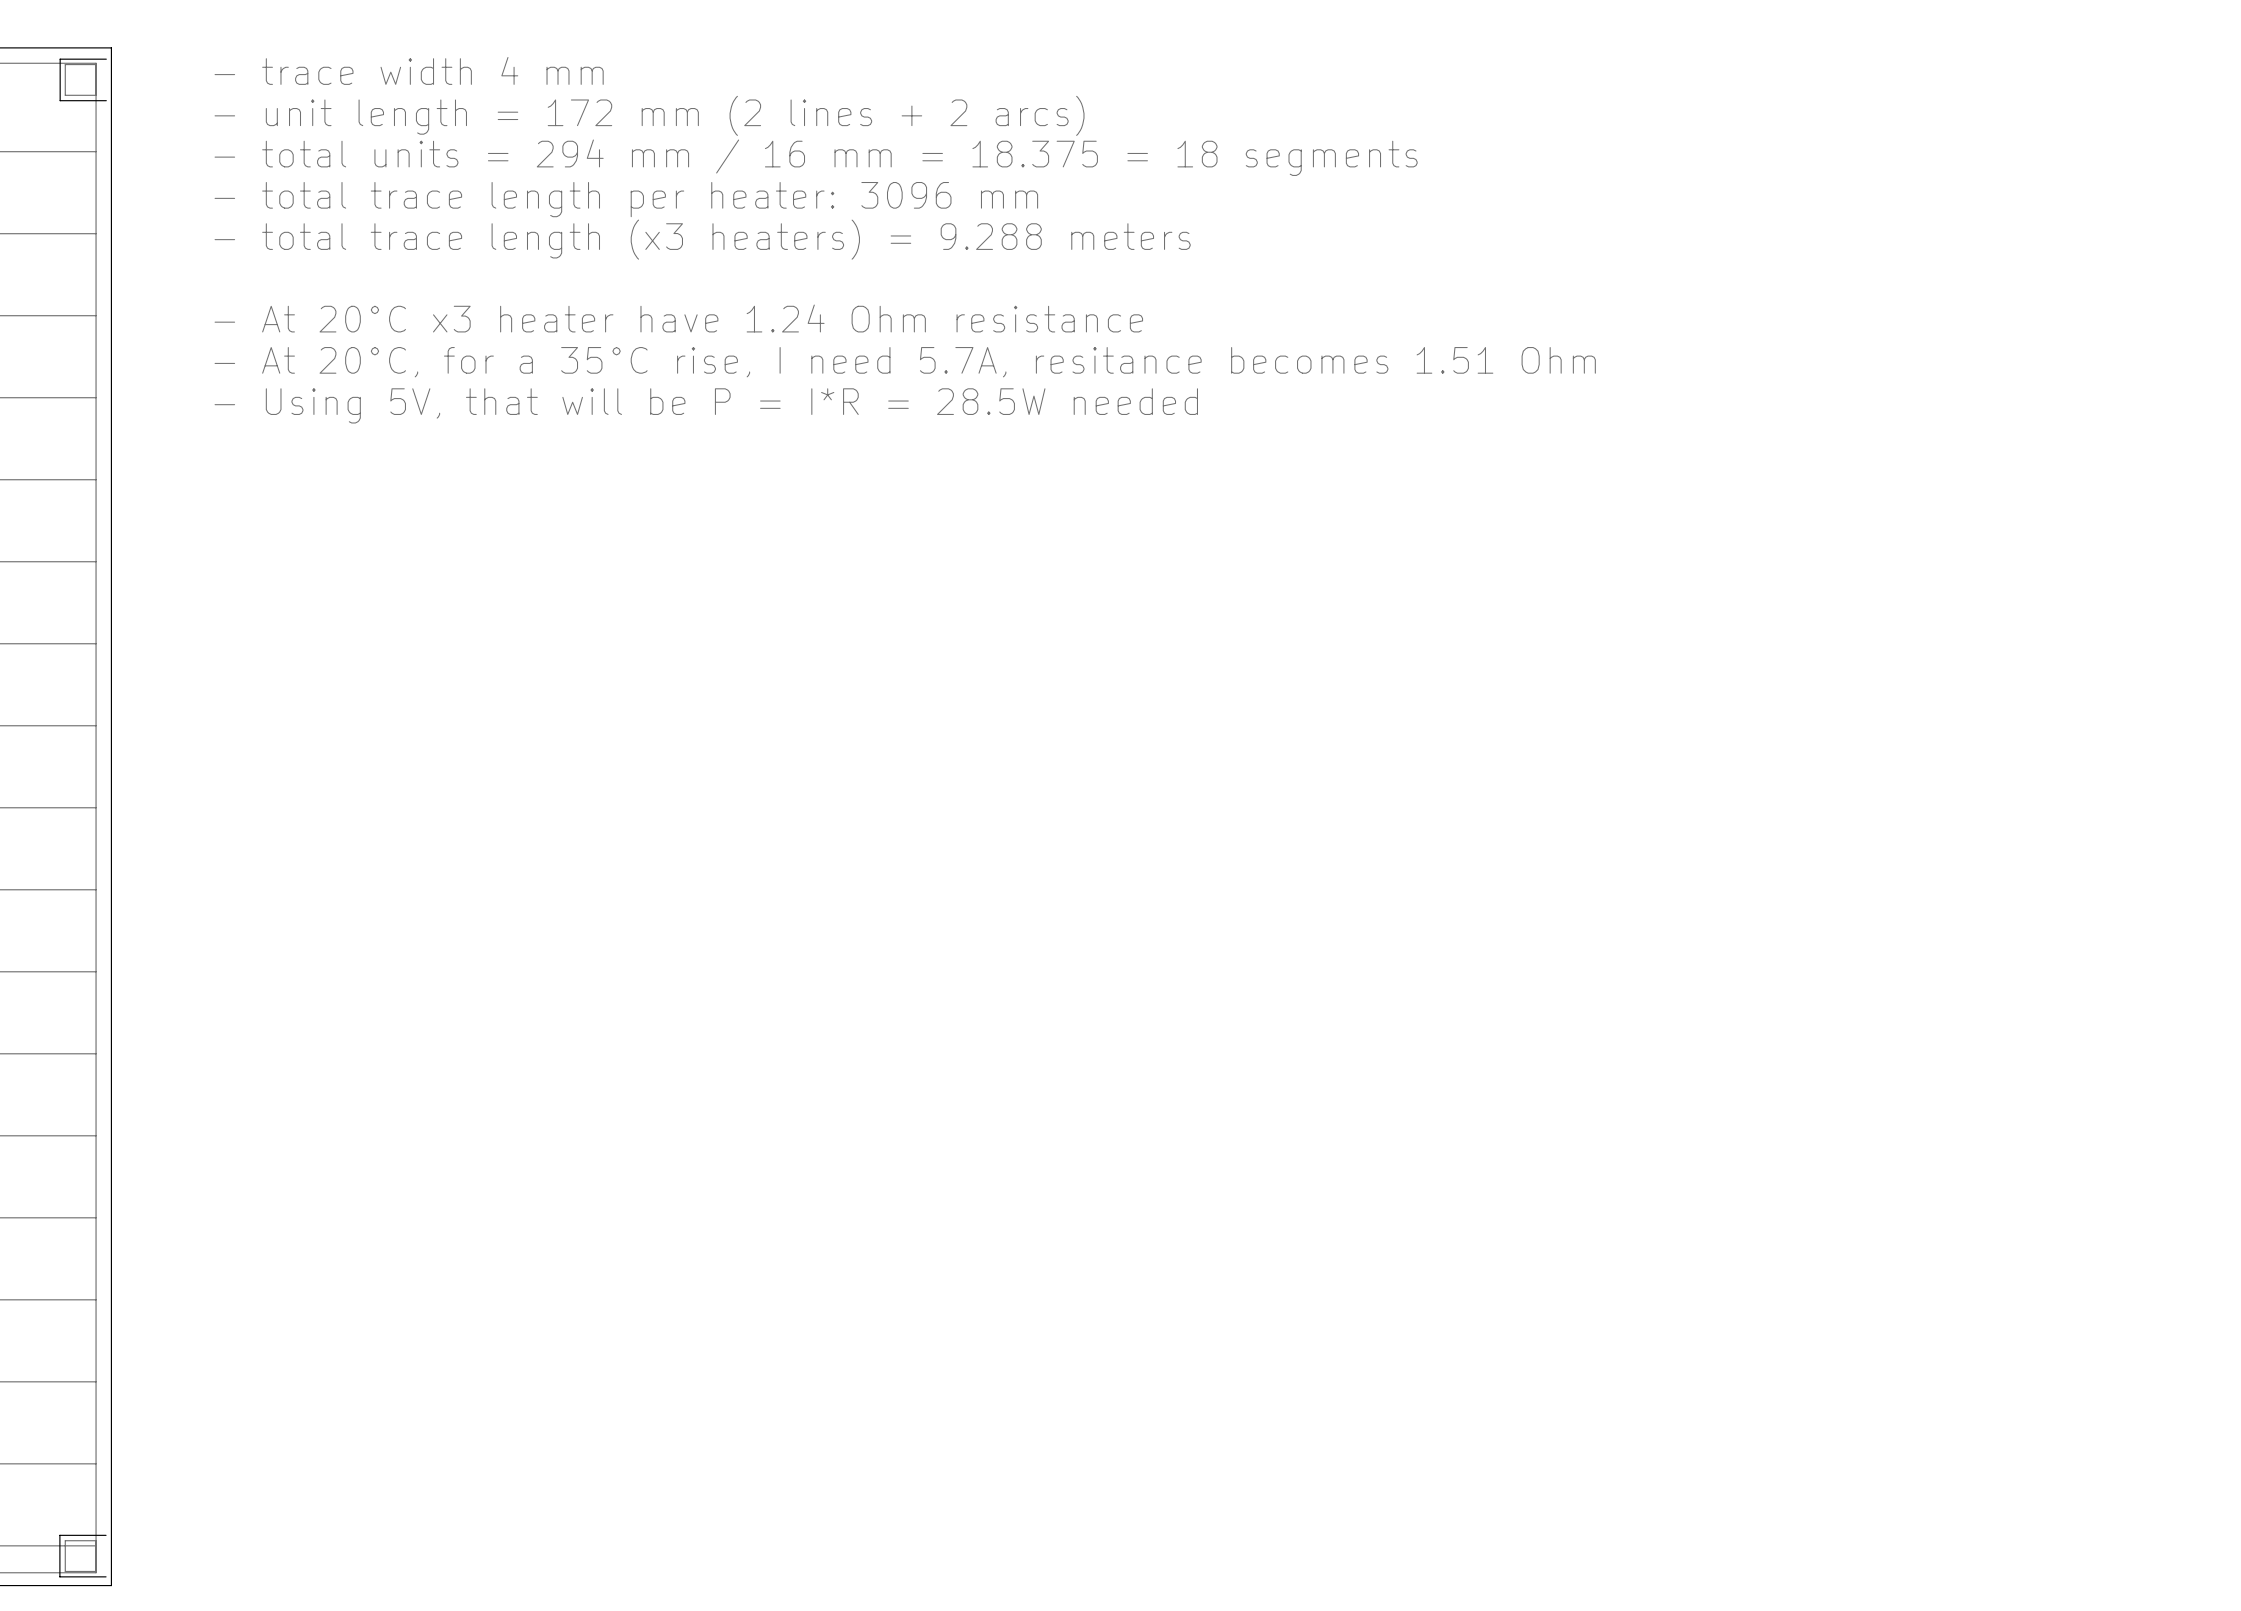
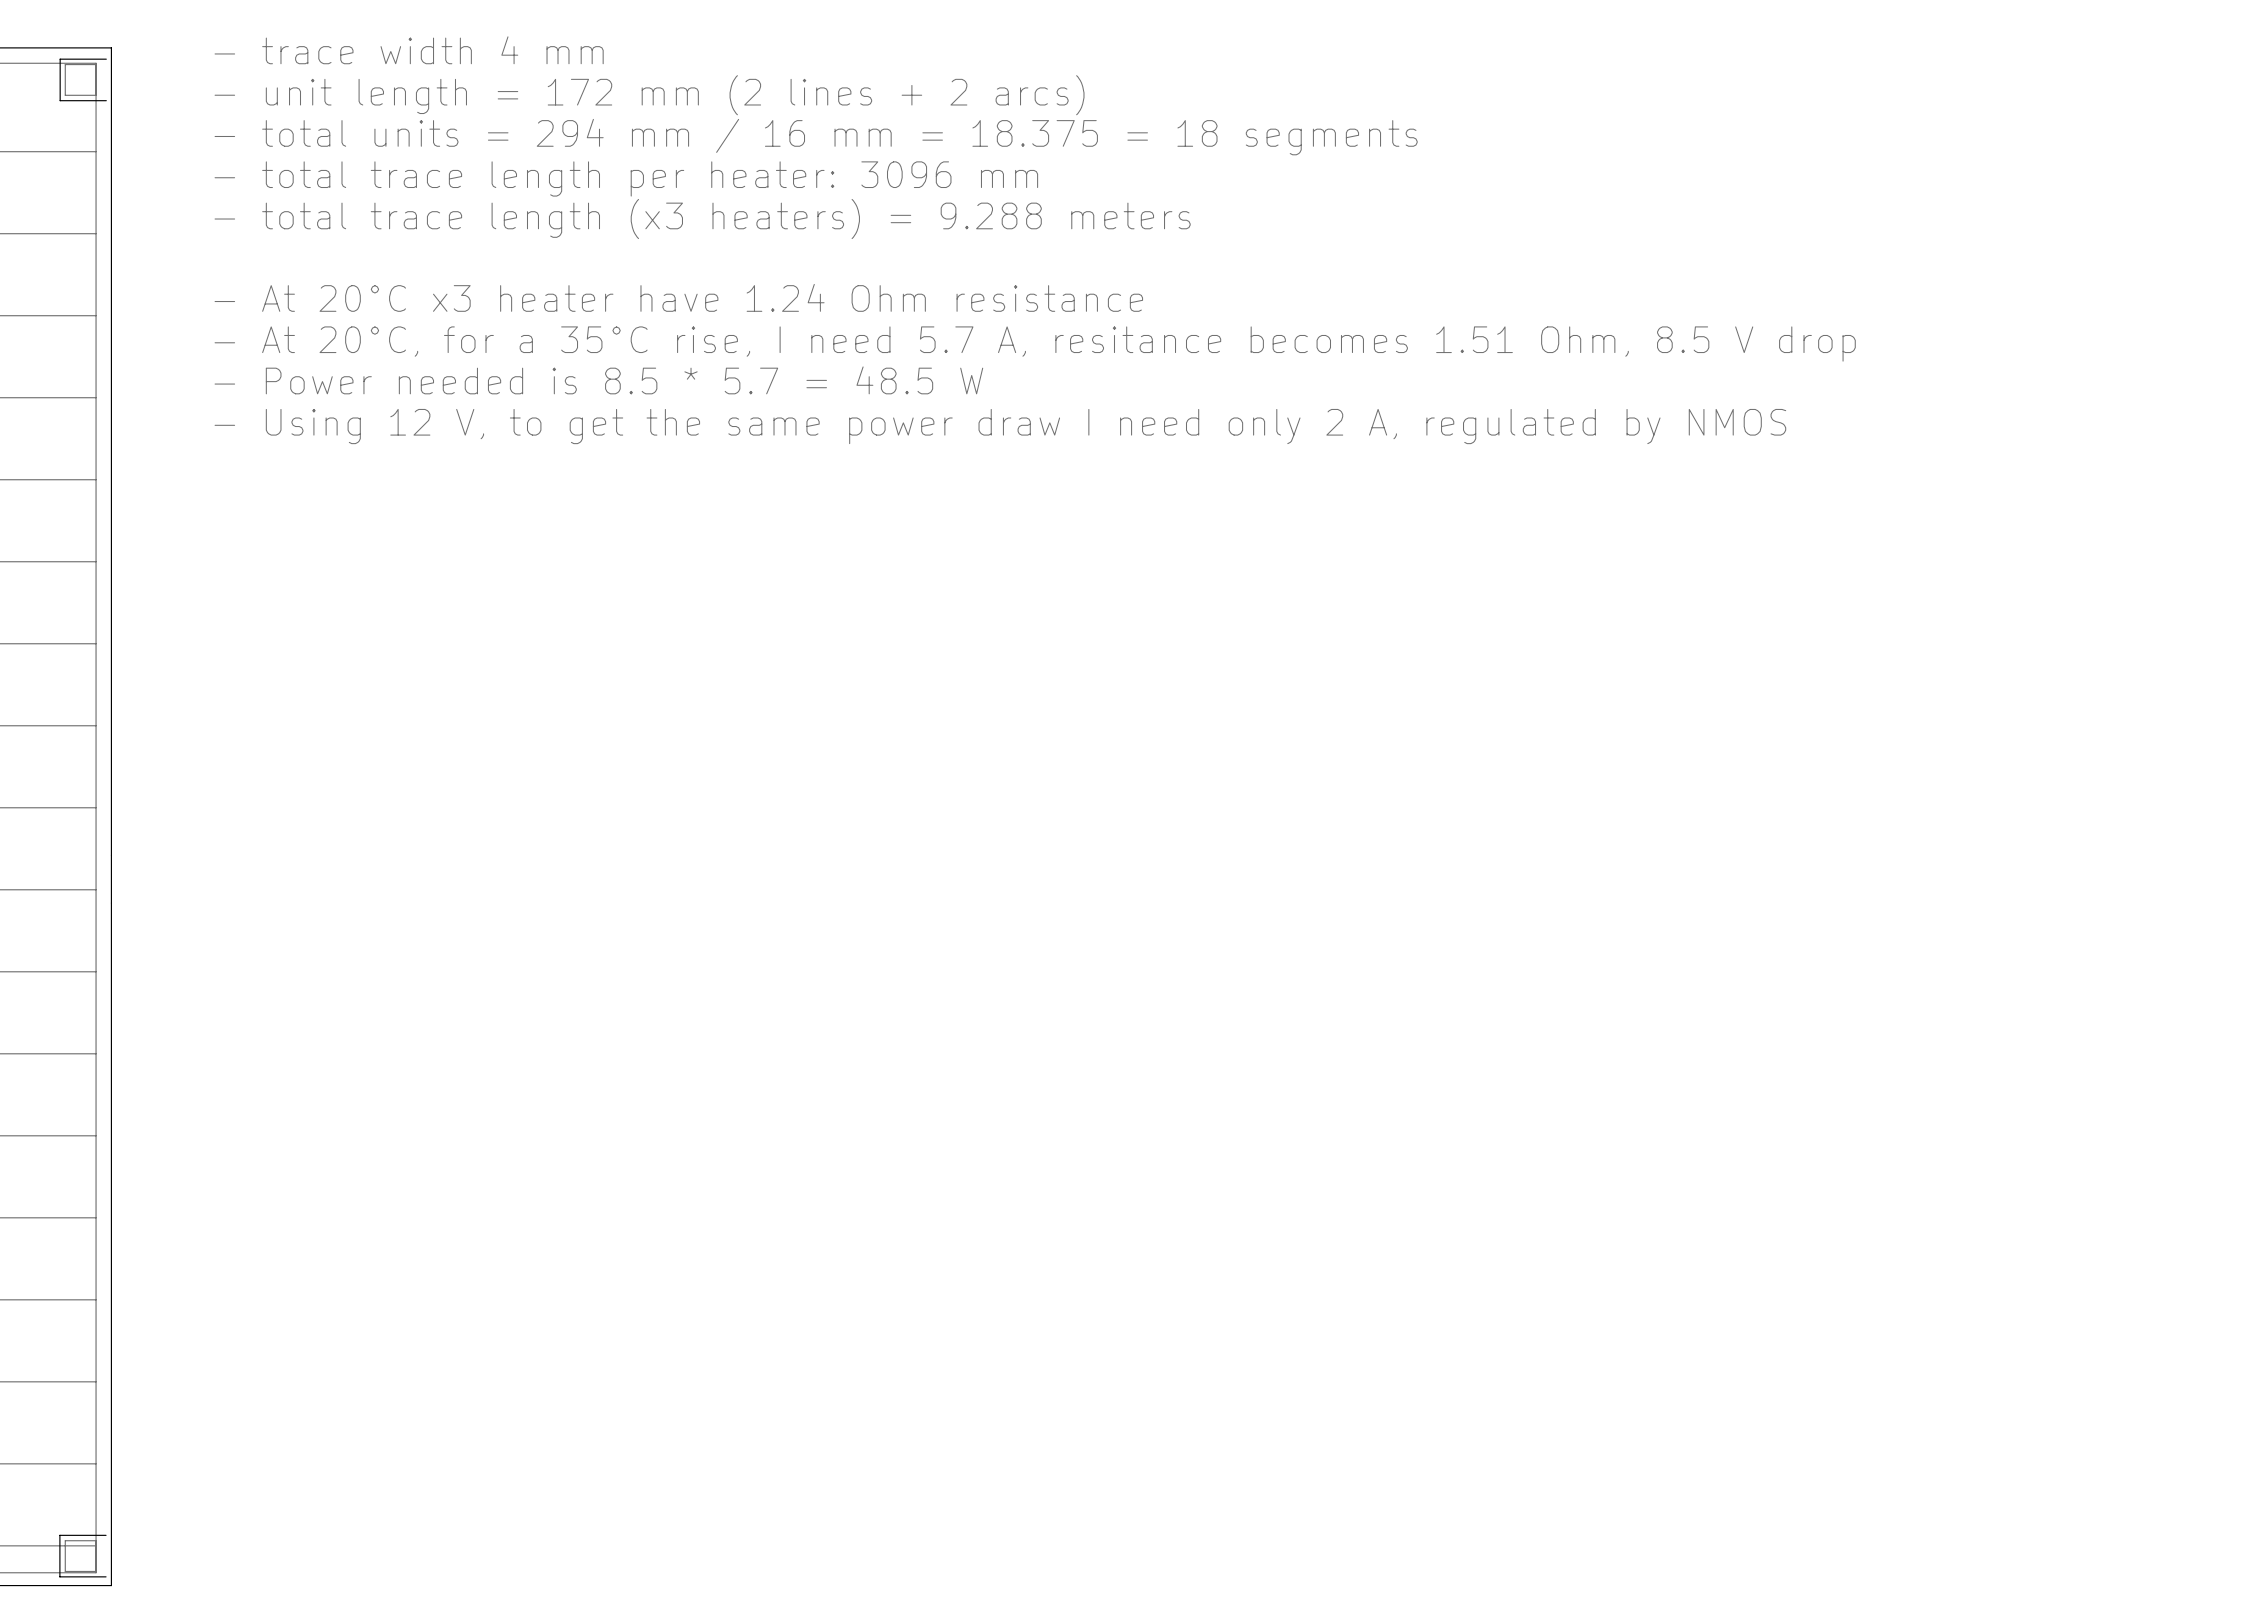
text position: - trace width 4 mm (409, 70) -> - trace width 4 mm (409, 50)
text position: - unit length = 172 mm (2 lines + 2 arcs) (649, 115) -> - unit length = 172 mm (2 lines + 2 arcs) (649, 95)
text position: - total units = 294 mm / 16 mm = 18.375 = 18 segments (816, 157) -> - total units = 294 mm / 16 mm = 18.375 = 18 segments (816, 137)
text position: - total trace length per heater: 3096 mm (626, 199) -> - total trace length per heater: 3096 mm (626, 178)
text position: - total trace length (x3 heaters) = 9.288 meters (702, 239) -> - total trace length (x3 heaters) = 9.288 meters (702, 219)
text position: - At 20°C x3 heater have 1.24 Ohm resistance (678, 318) -> - At 20°C x3 heater have 1.24 Ohm resistance (678, 297)
text: - At 20°C, for a 35°C rise, I need 5.7A, resitance becomes 1.51 Ohm (905, 362) -> - At 20°C, for a 35°C rise, I need 5.7 A, resitance becomes 1.51 Ohm, 8.5 V drop (1035, 344)
text: none -> - Power needed is 8.5 * 5.7 = 48.5 W (598, 380)
text: - Using 5V, that will be P = I*R = 28.5W needed (706, 405) -> none
text: none -> - Using 12 V, to get the same power draw I need only 2 A, regulated by NMOS (1000, 426)

